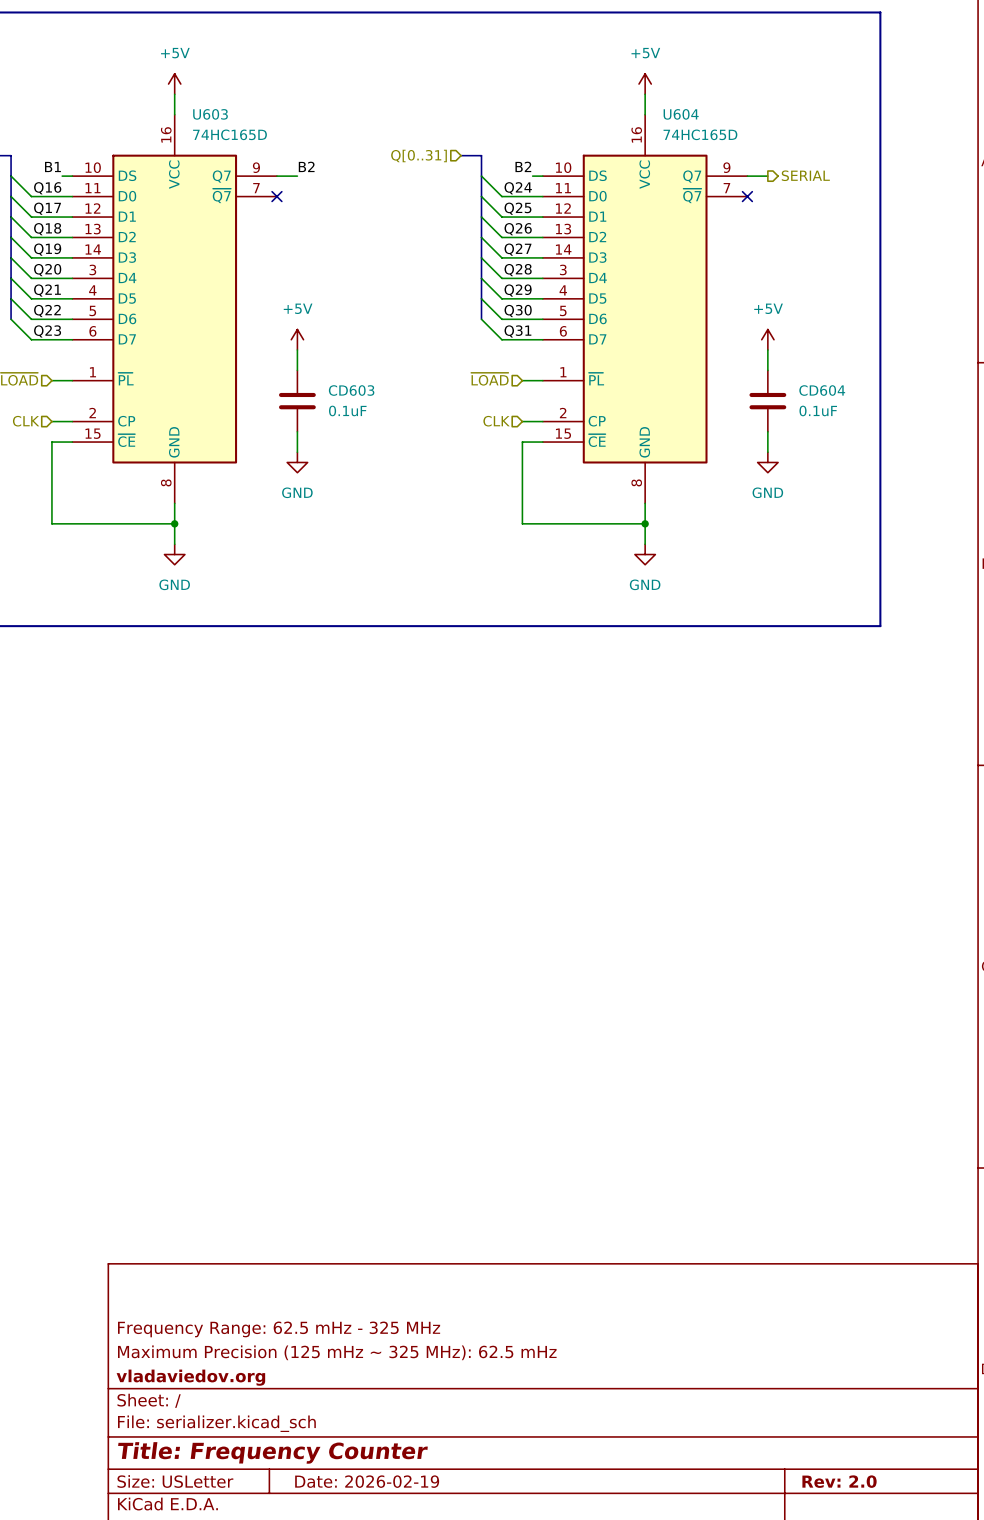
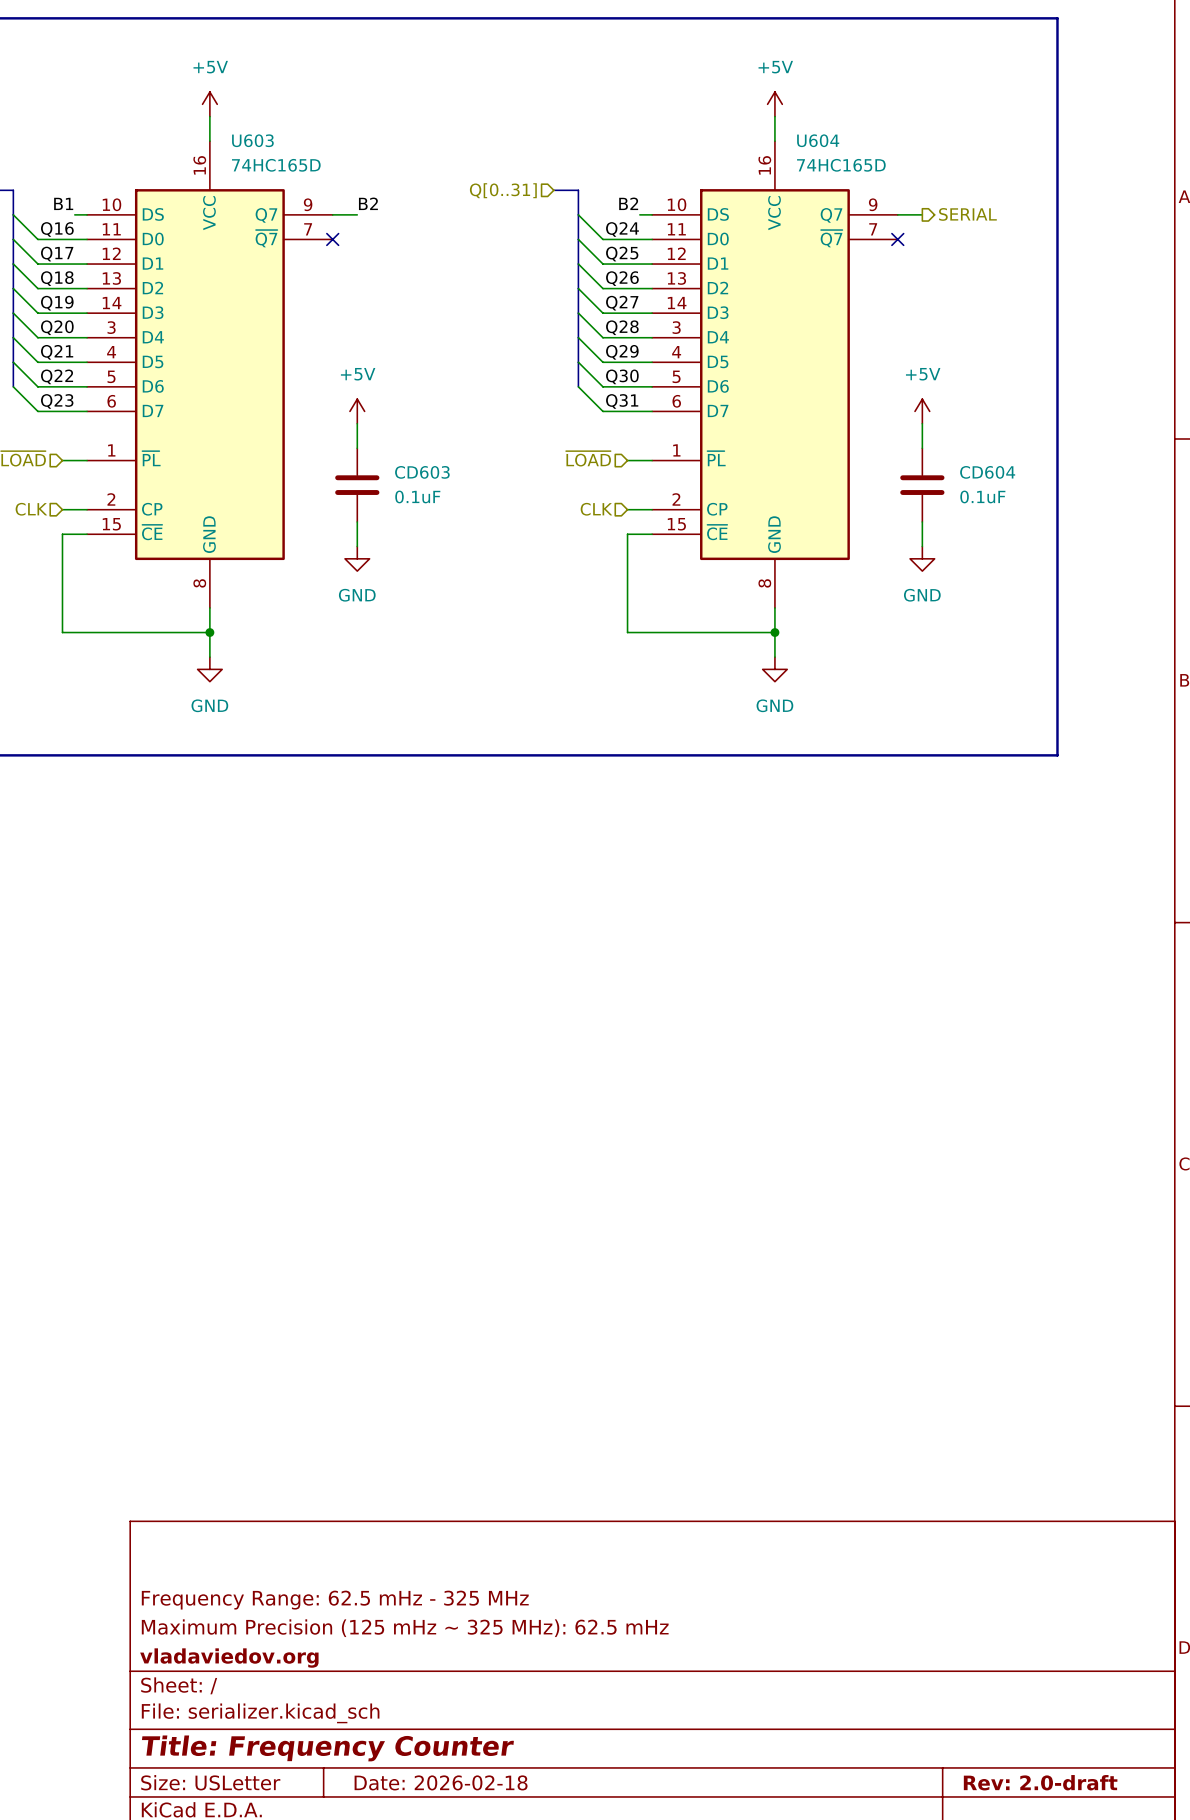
title block: Date: 2026-02-19 (367, 1481) -> Date: 2026-02-18 (441, 1782)
title block: Rev: 2.0 (839, 1481) -> Rev: 2.0-draft (1040, 1782)

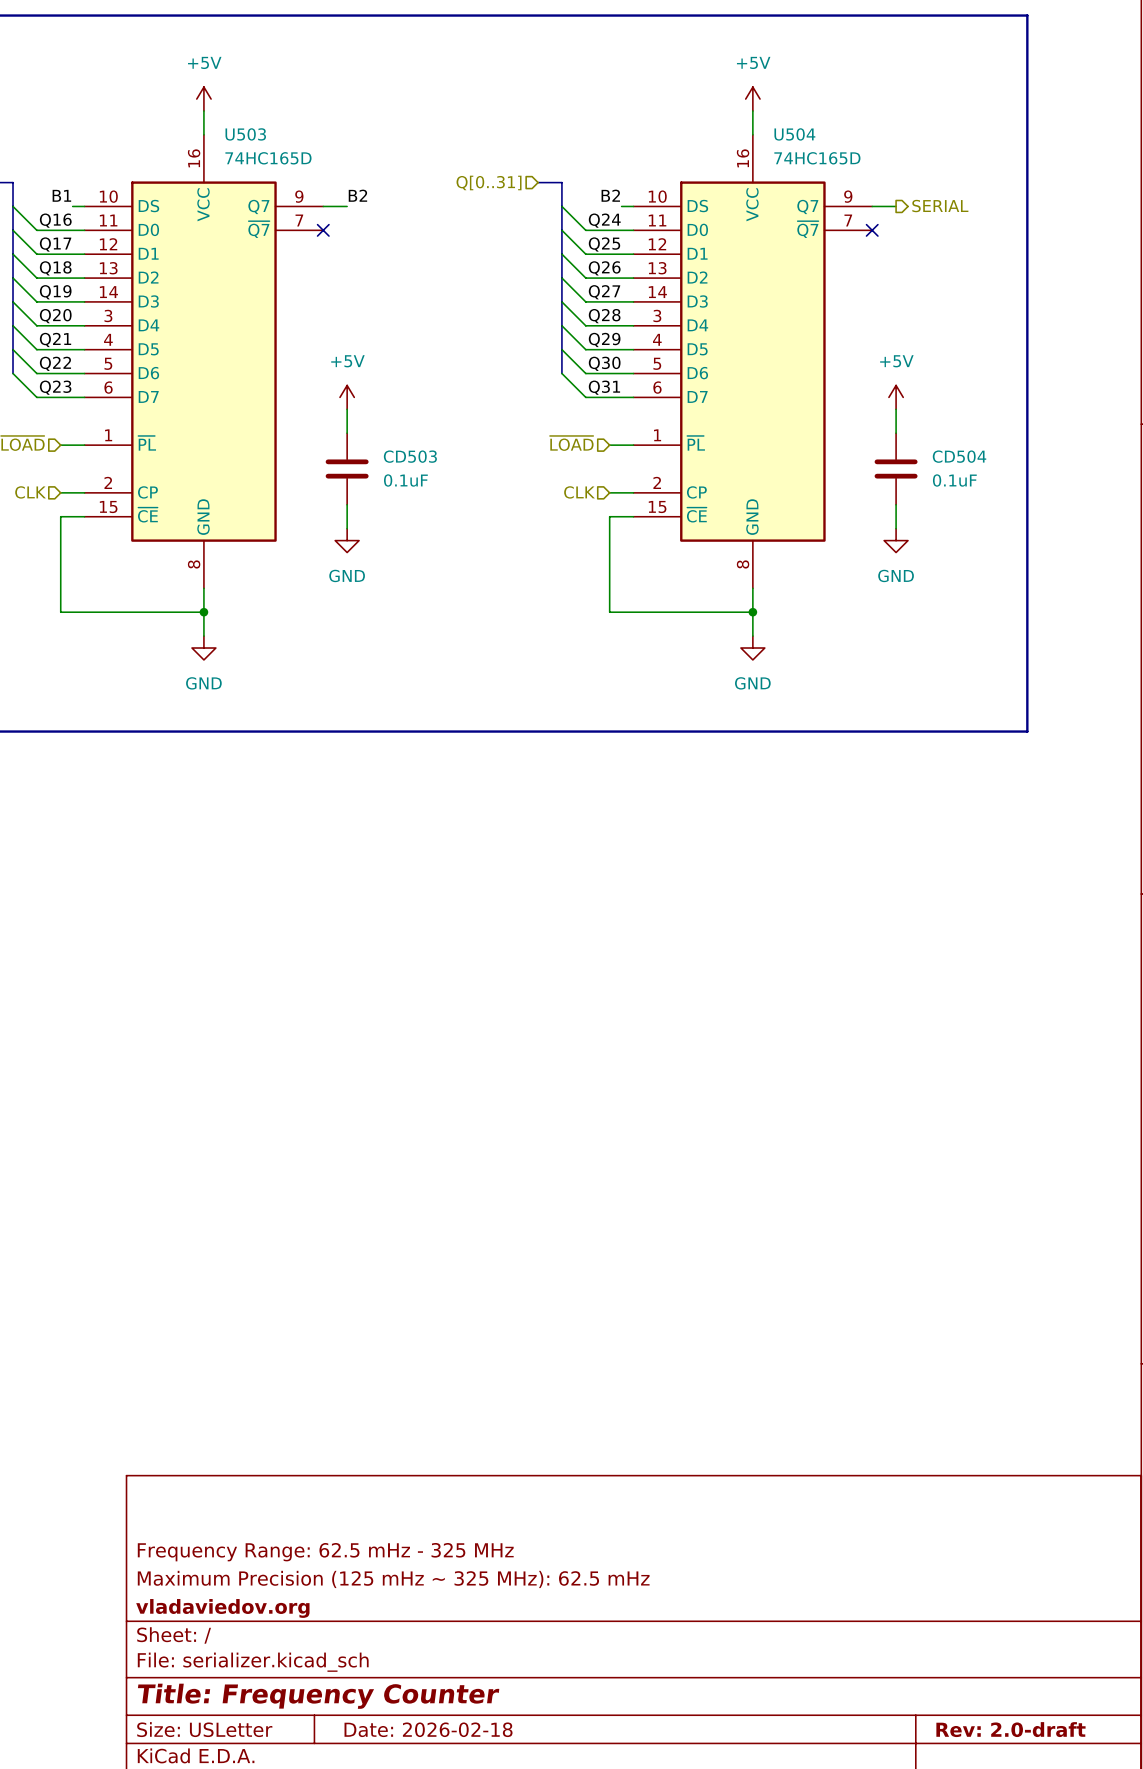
U603 name: U603 (252, 140) -> U503 (245, 134)
U604 name: U604 (818, 140) -> U504 (794, 134)
CD603 name: CD603 (422, 472) -> CD503 (410, 456)
CD604 name: CD604 (987, 472) -> CD504 (959, 456)

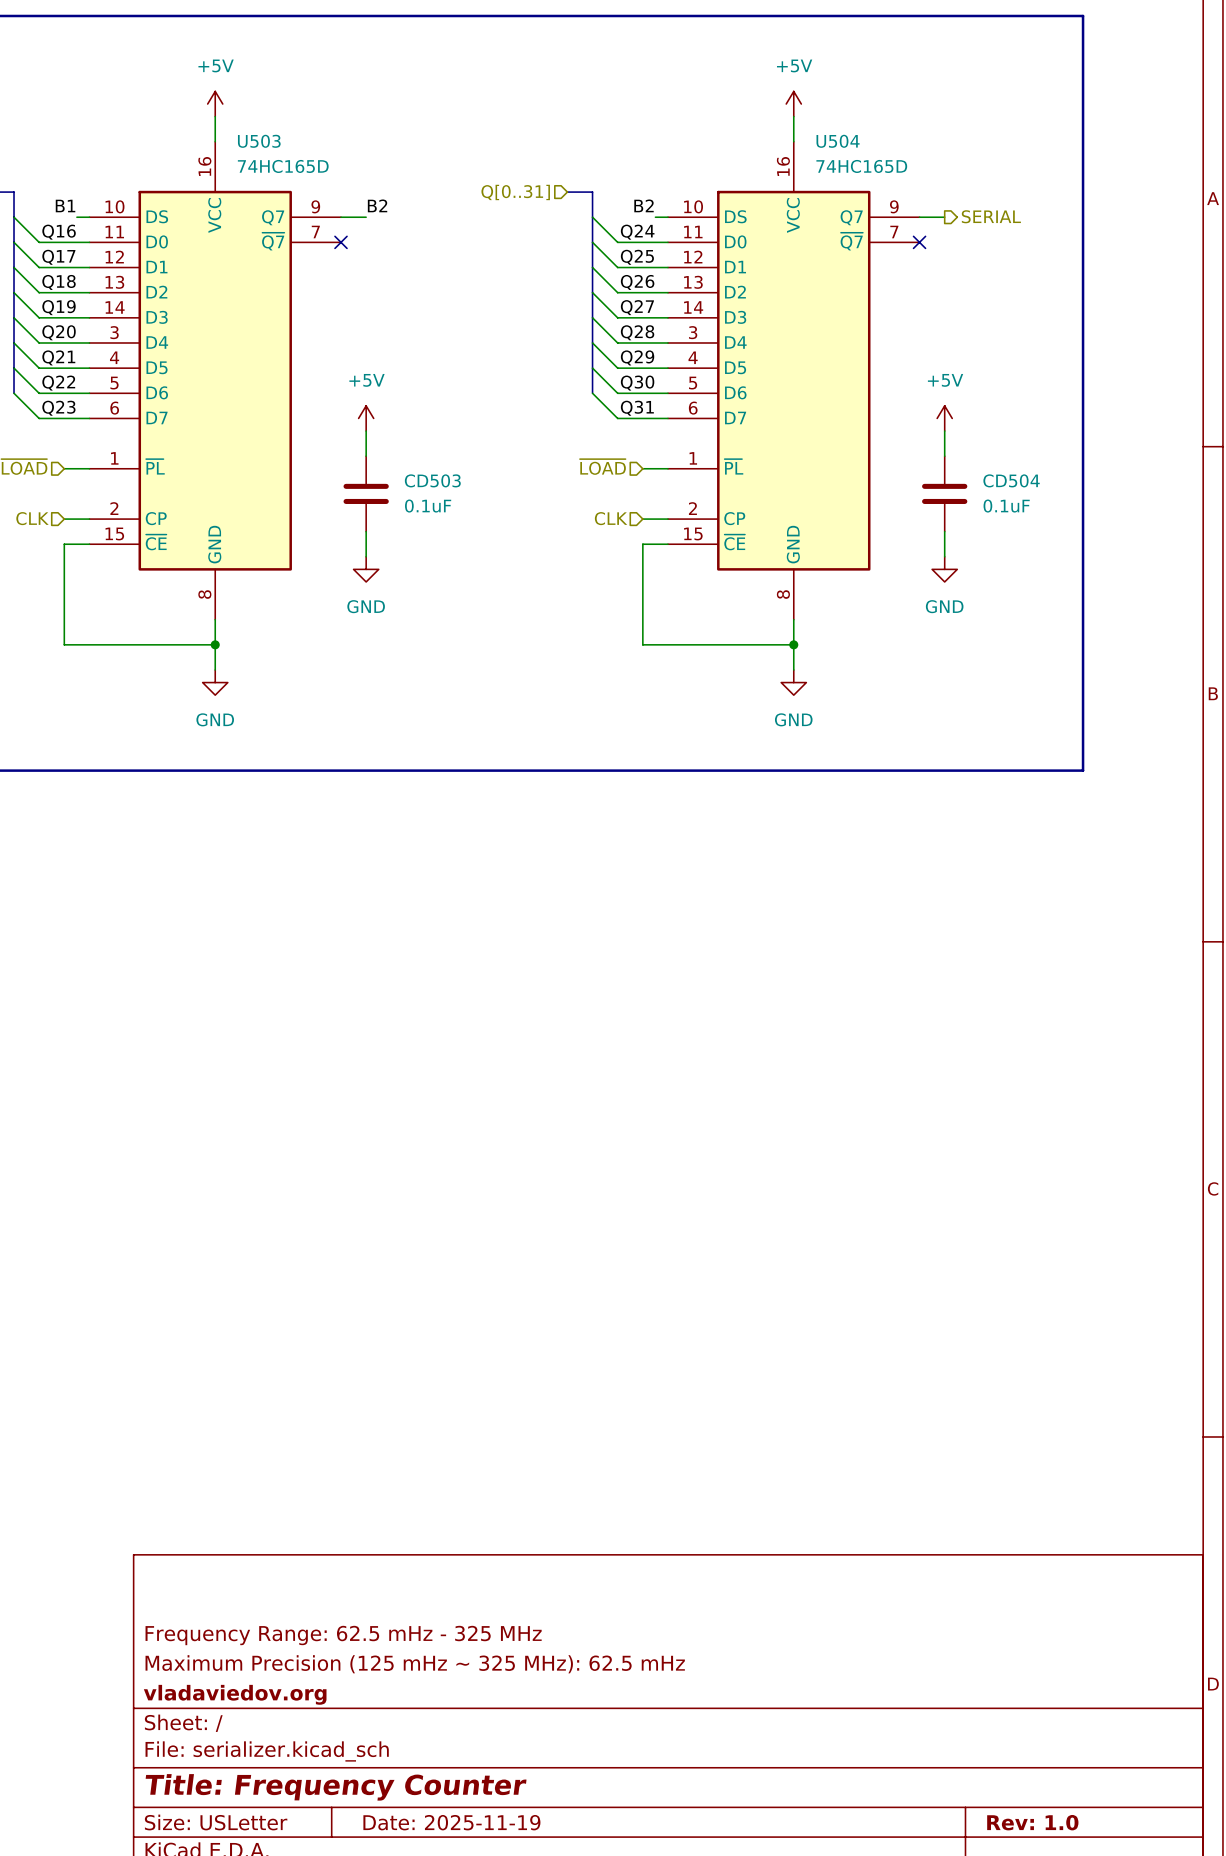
title block: Date: 2026-02-18 (428, 1729) -> Date: 2025-11-19 (451, 1822)
title block: Rev: 2.0-draft (1010, 1729) -> Rev: 1.0 (1032, 1822)

